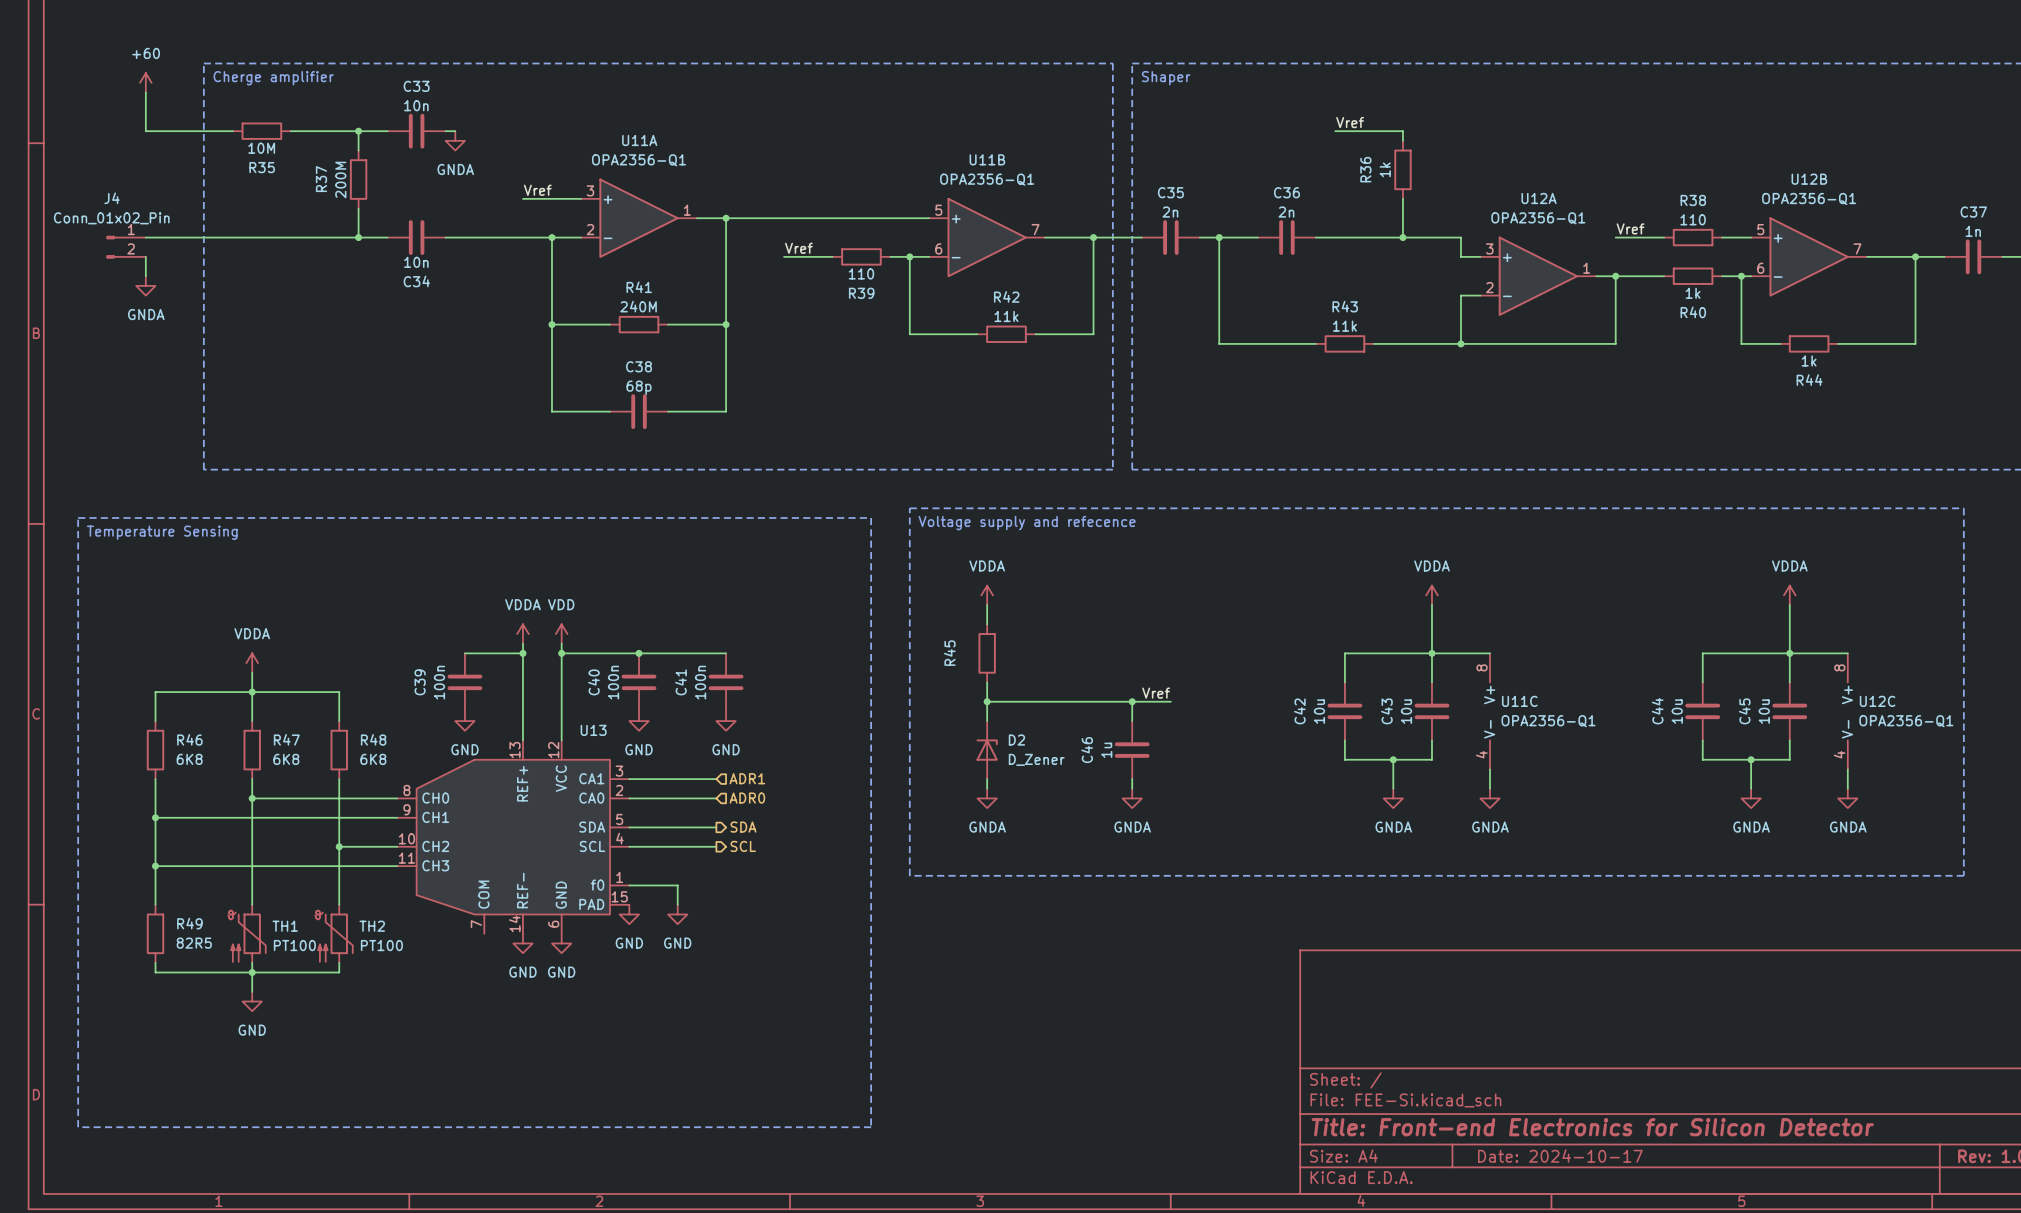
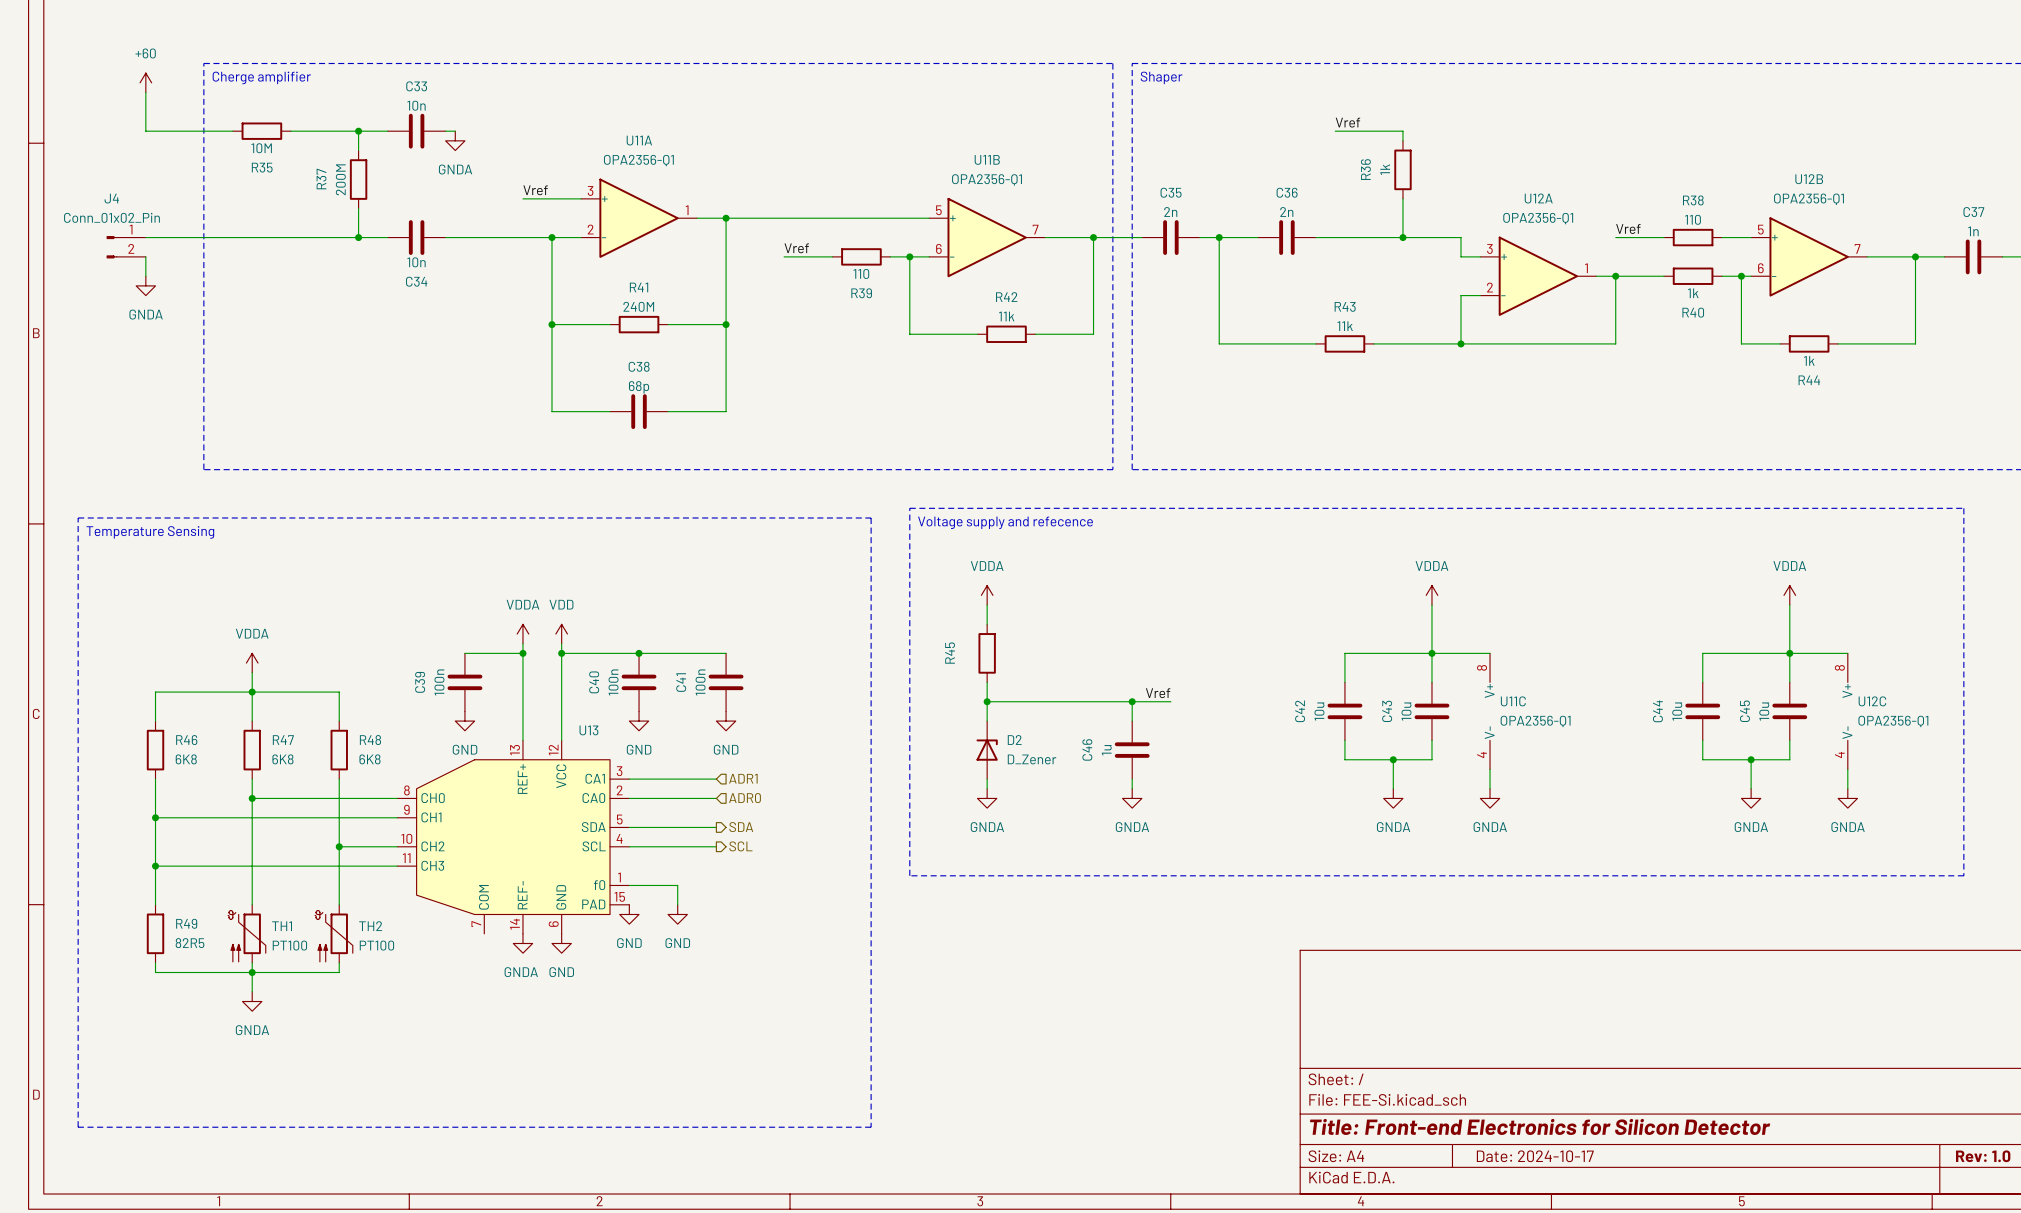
power symbol: GND (522, 943) -> GNDA (522, 943)
power symbol: GND (252, 1001) -> GNDA (252, 1001)

